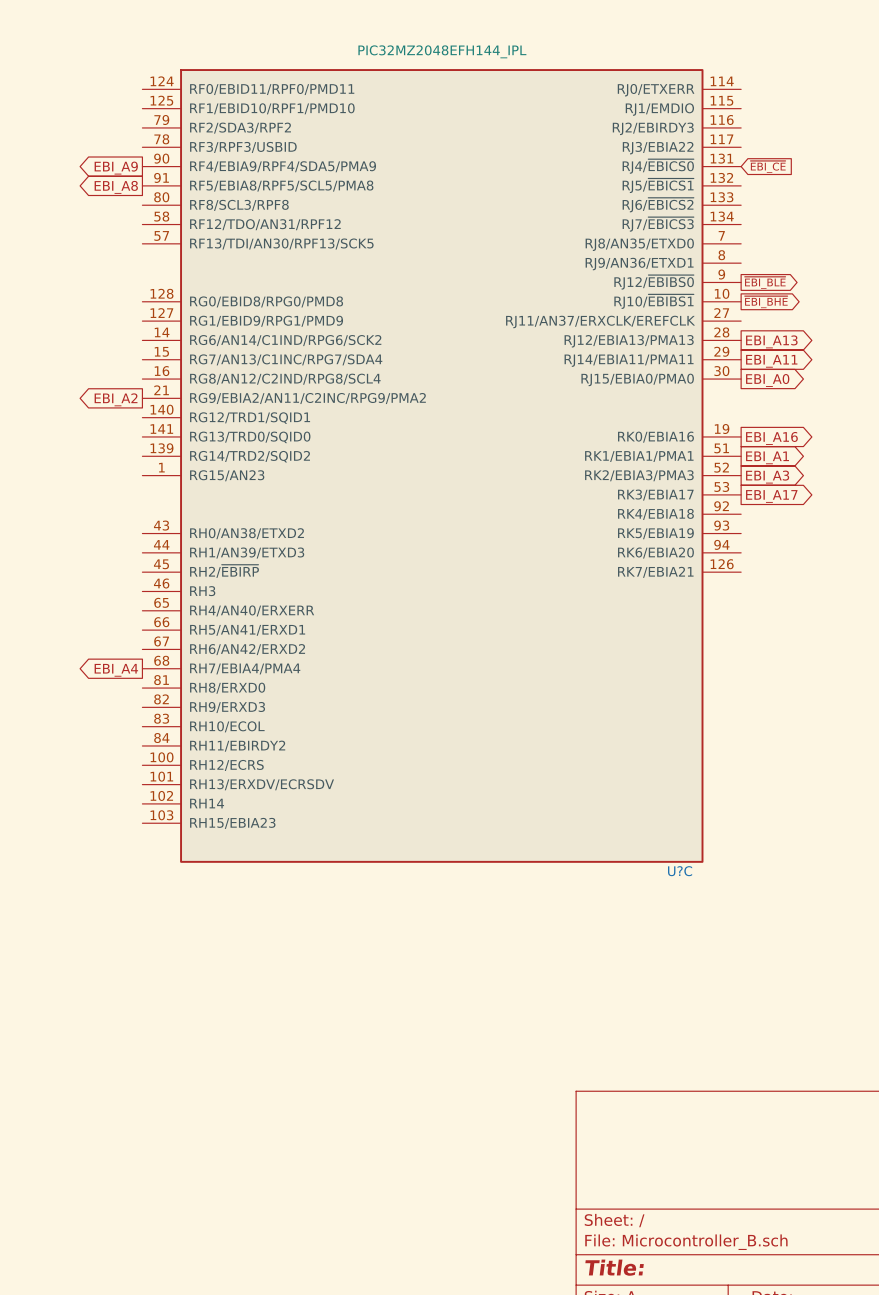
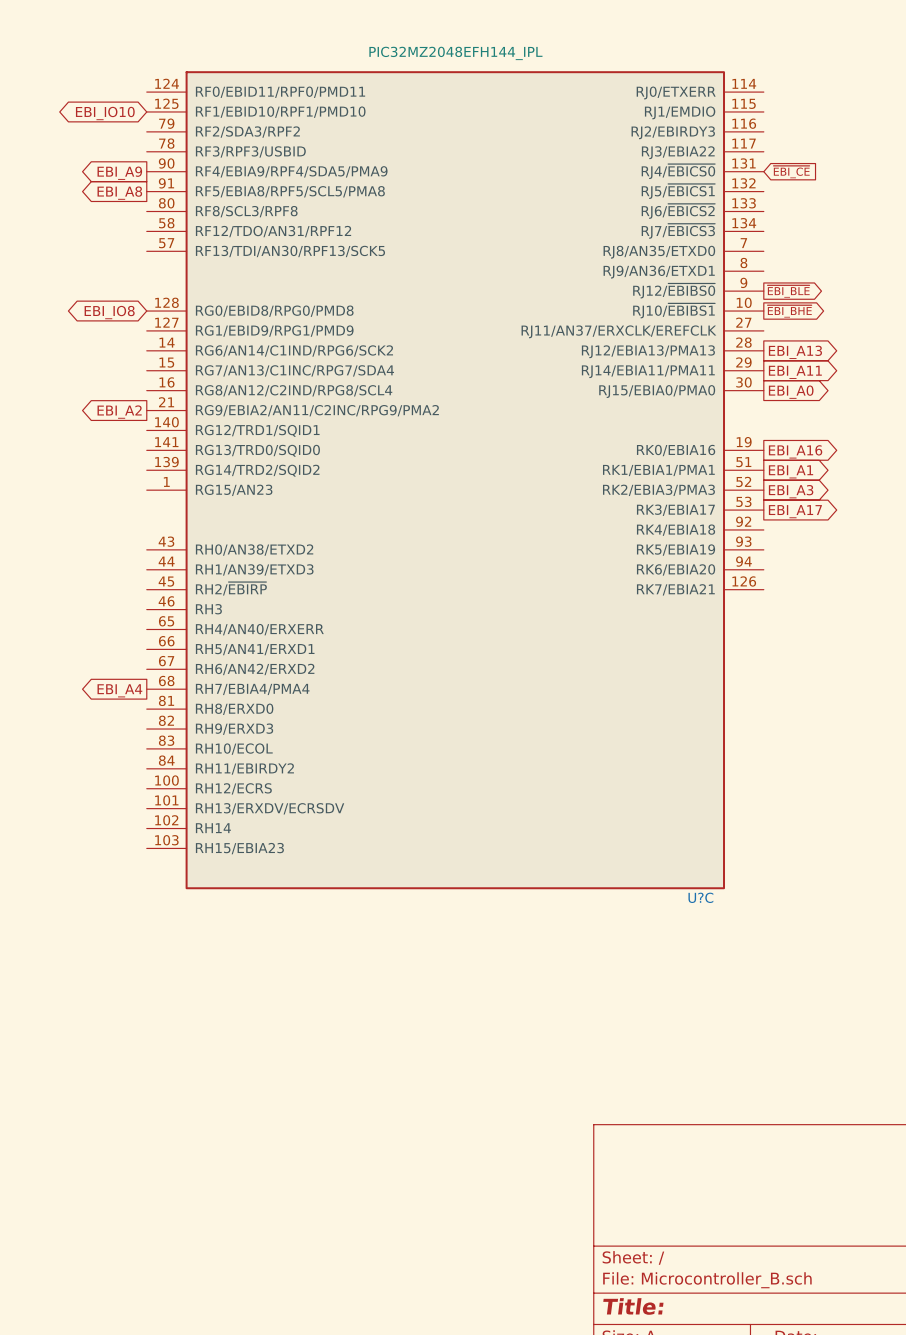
global label: none -> EBI_IO10 (105, 113)
global label: none -> EBI_IO8 (109, 312)

